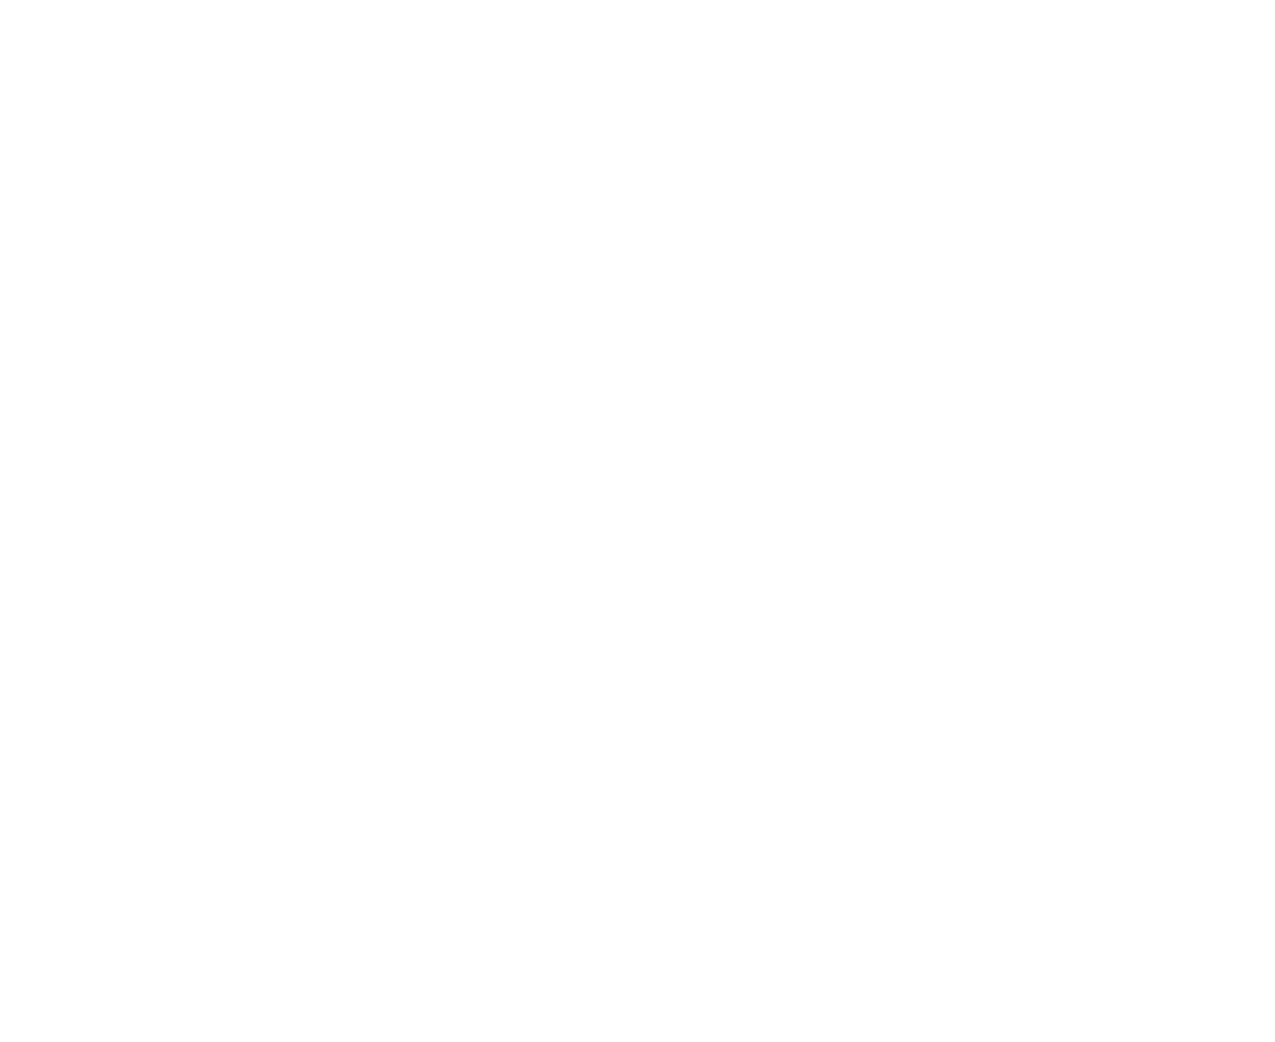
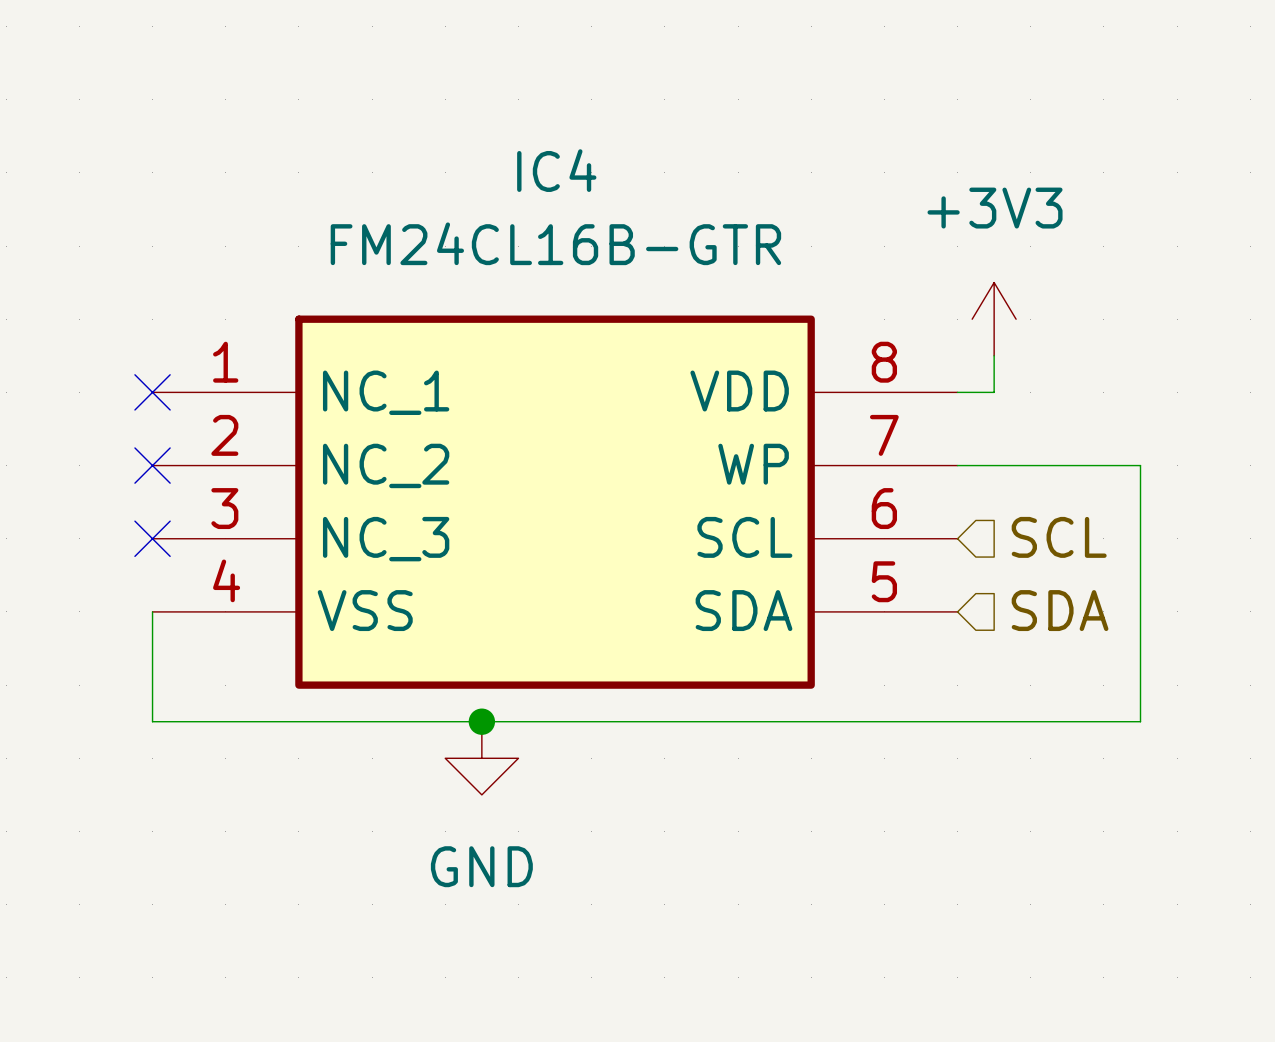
power symbol: none -> +3V3 (994, 319)
wire: none -> (994, 355) (994, 392) (957, 392)
no-connect mark: none -> (152, 392)
no-connect mark: none -> (152, 465)
wire: none -> (957, 465) (1140, 465) (1140, 721) (152, 721) (152, 611)
IC4: none -> FM24CL16B-GTR (555, 502)
hierarchical label: none -> SCL (1059, 537)
no-connect mark: none -> (152, 538)
hierarchical label: none -> SDA (1060, 610)
junction: none -> (481, 721)
power symbol: none -> GND (481, 758)

